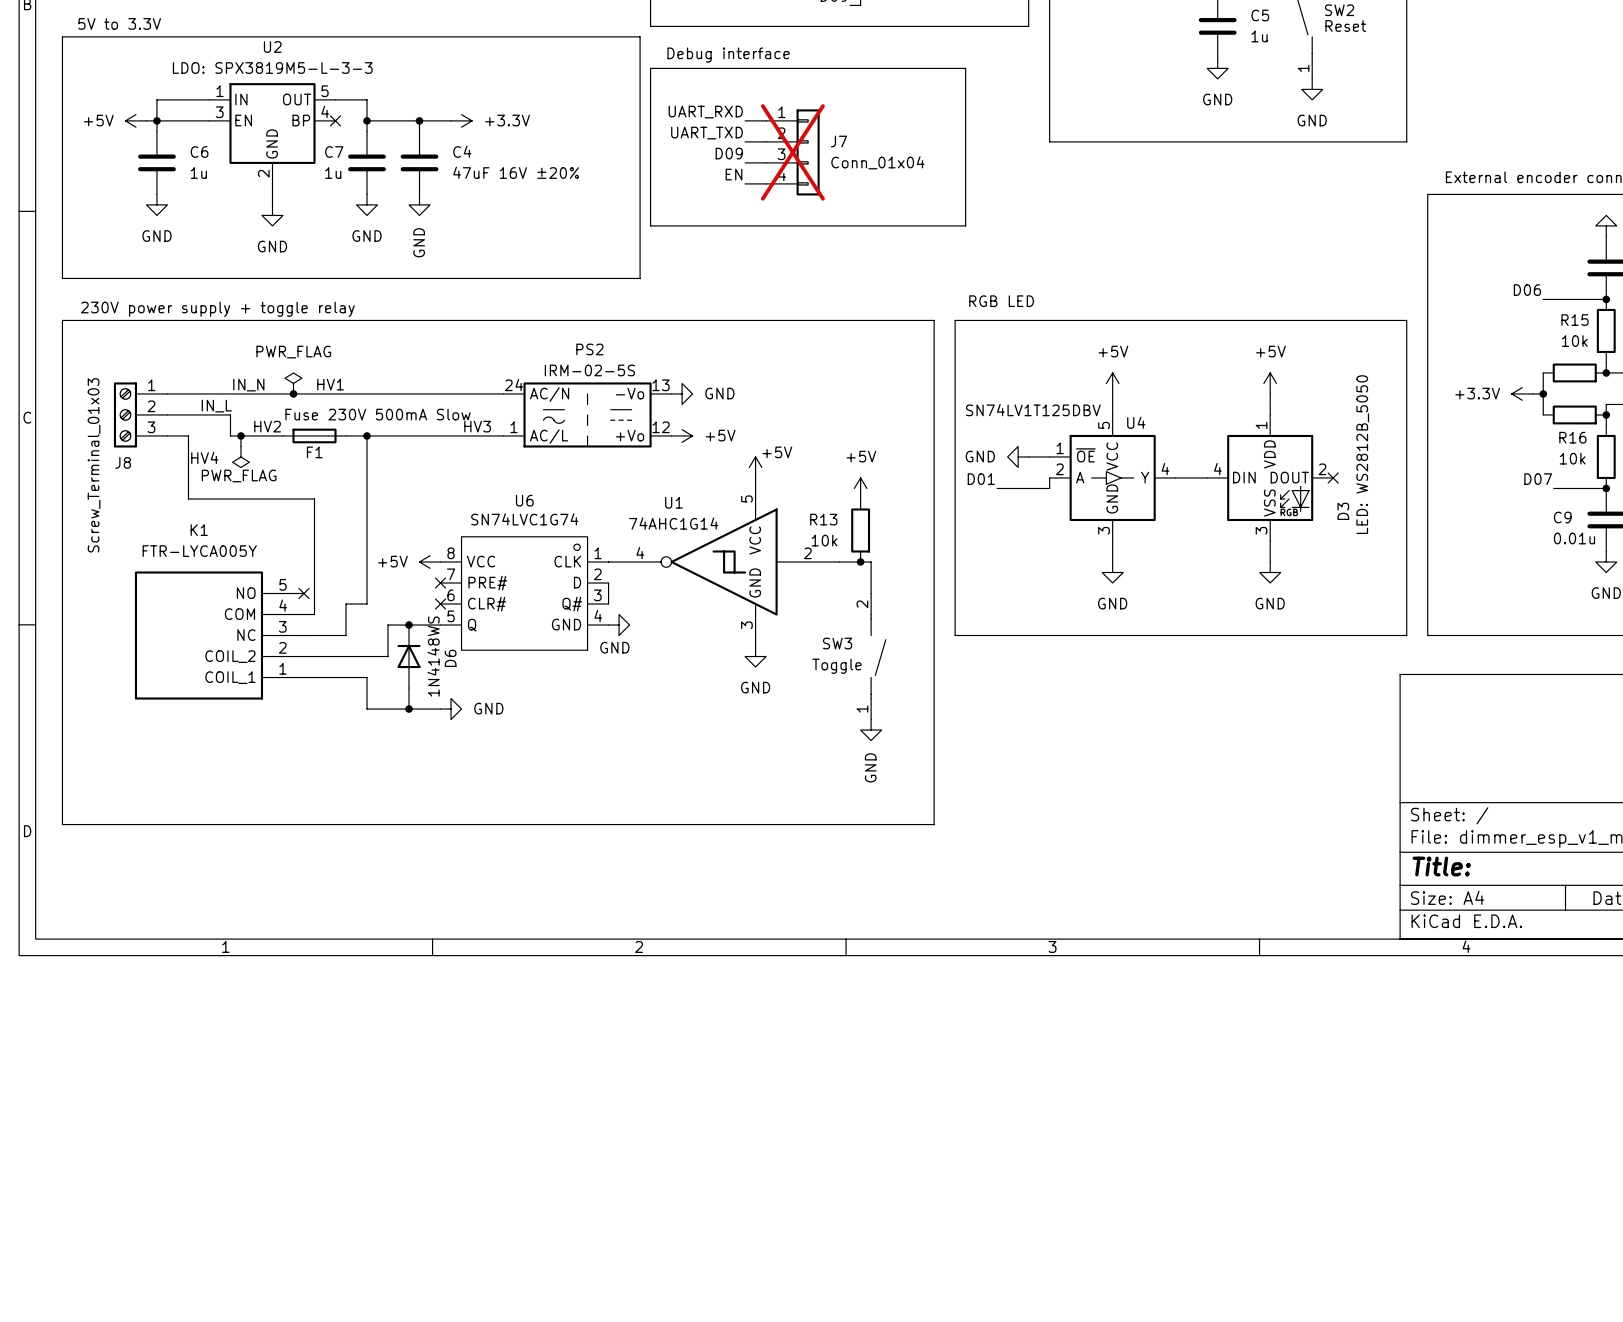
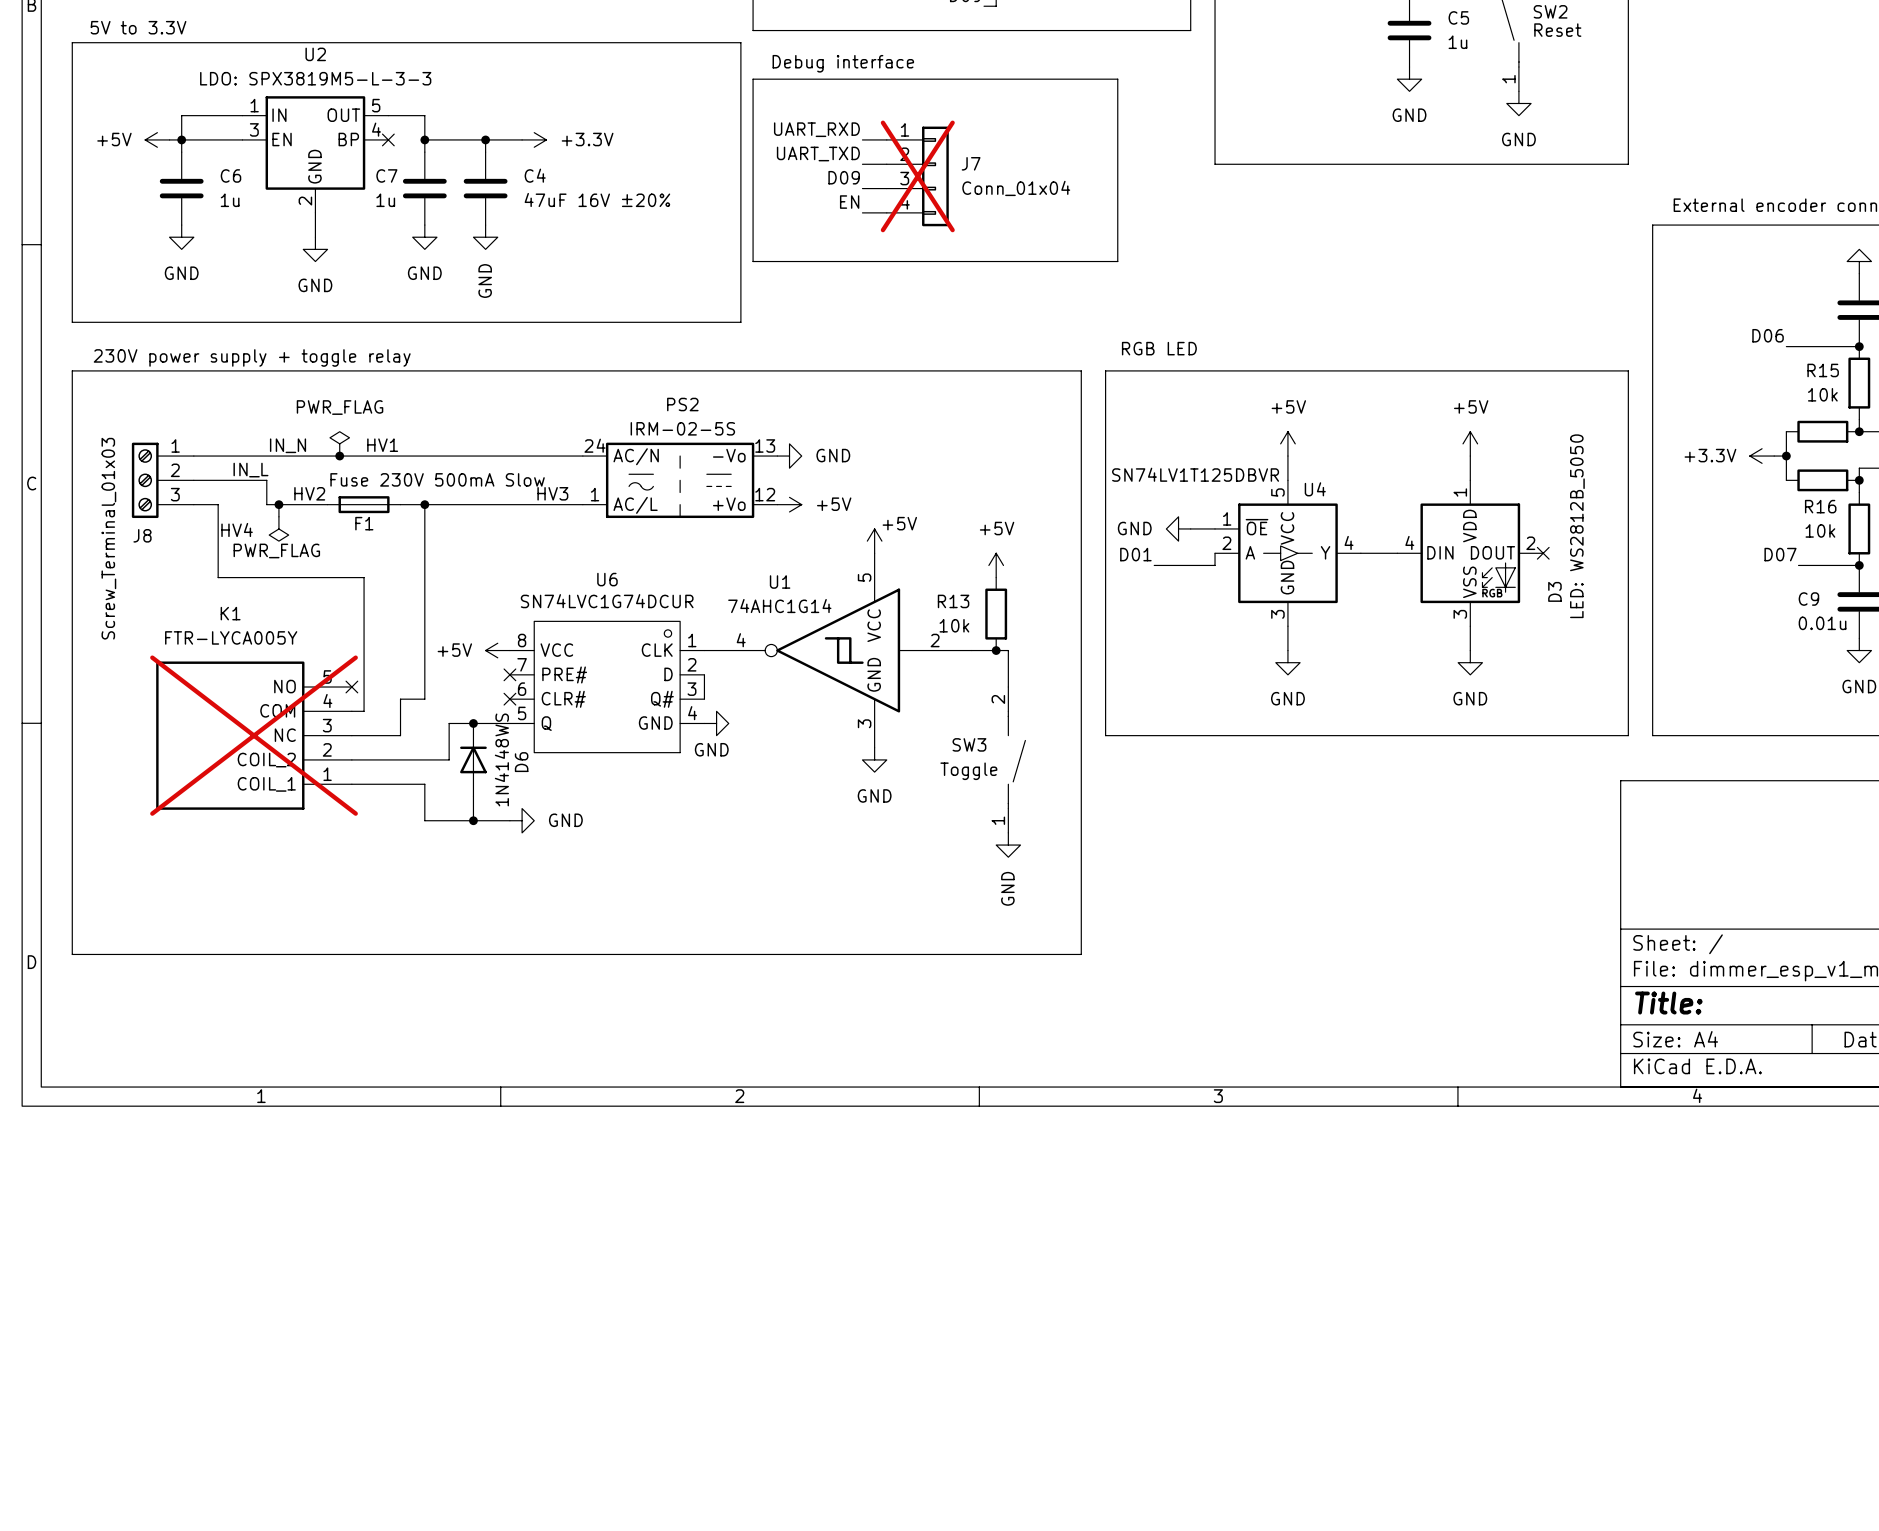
U4 value: SN74LV1T125DBV (1033, 410) -> SN74LV1T125DBVR (1195, 474)
U6 value: SN74LVC1G74 (524, 519) -> SN74LVC1G74DCUR (607, 601)
K1 do-not-place cross: none -> (254, 735)

